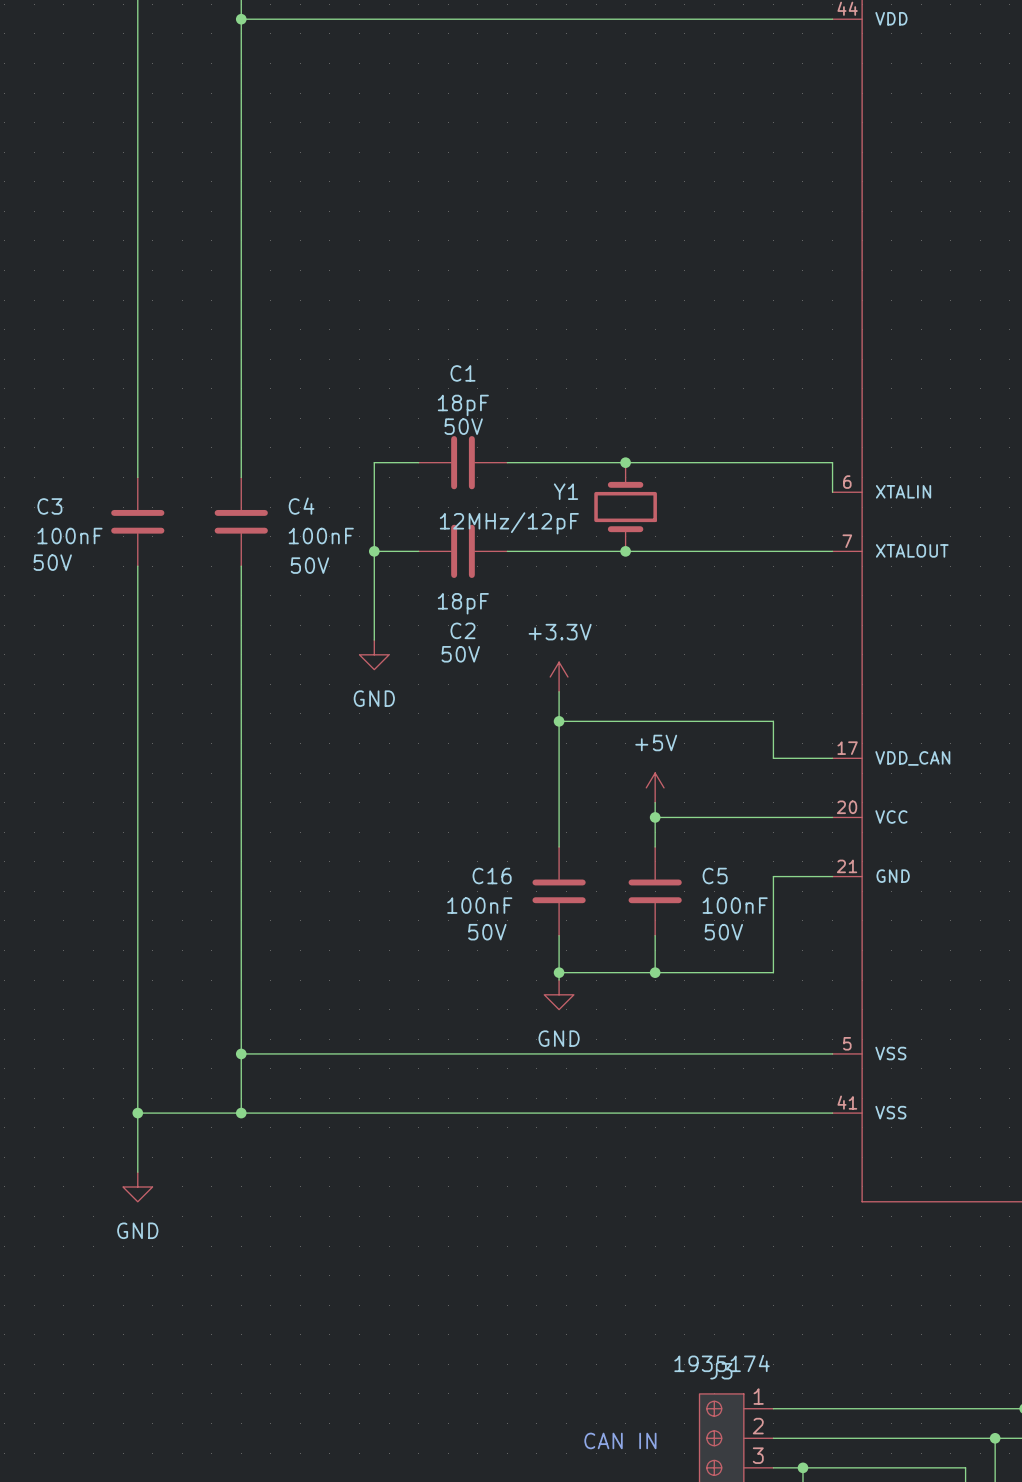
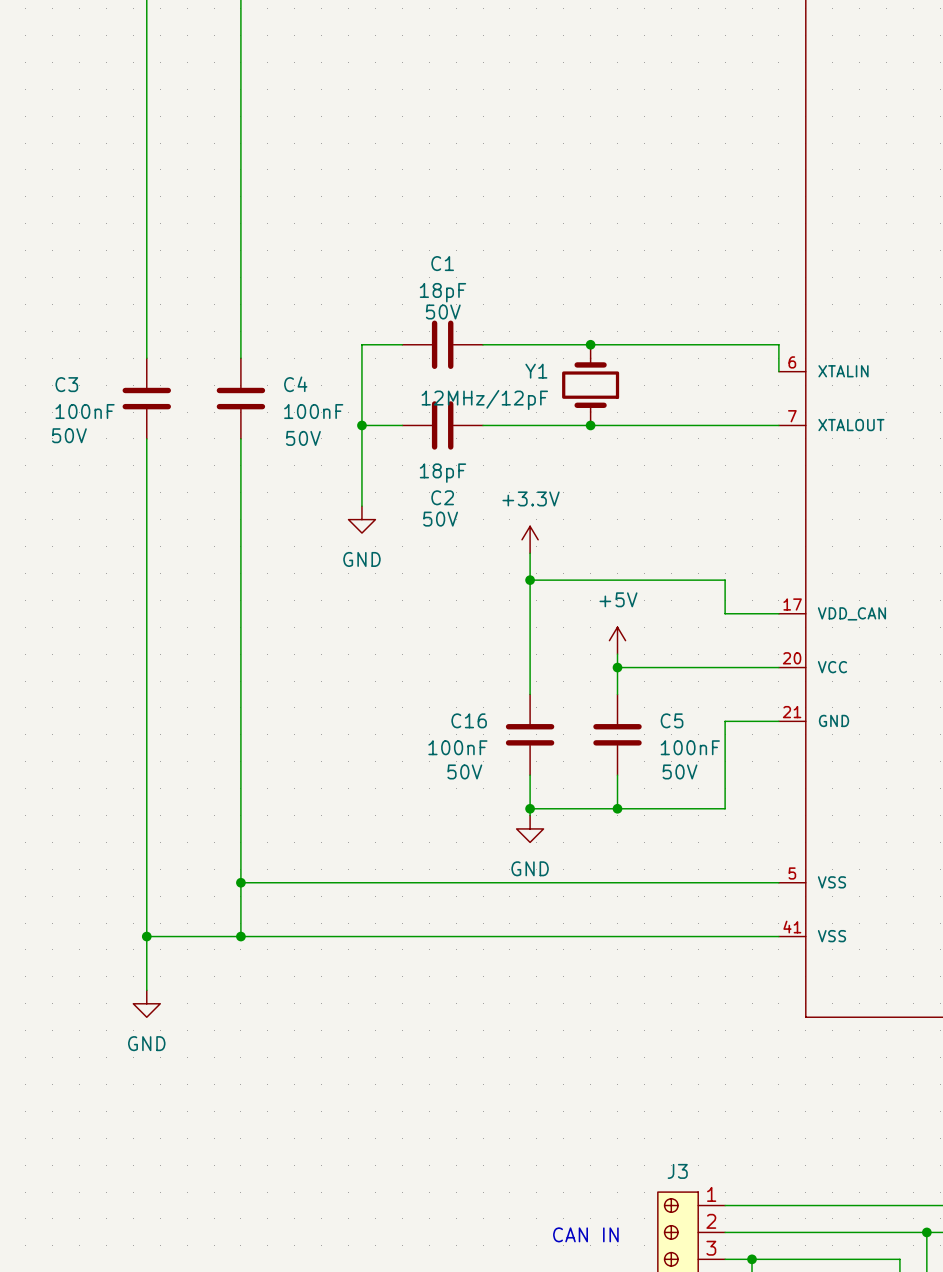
J3 value: 1935174 (722, 1363) -> none

